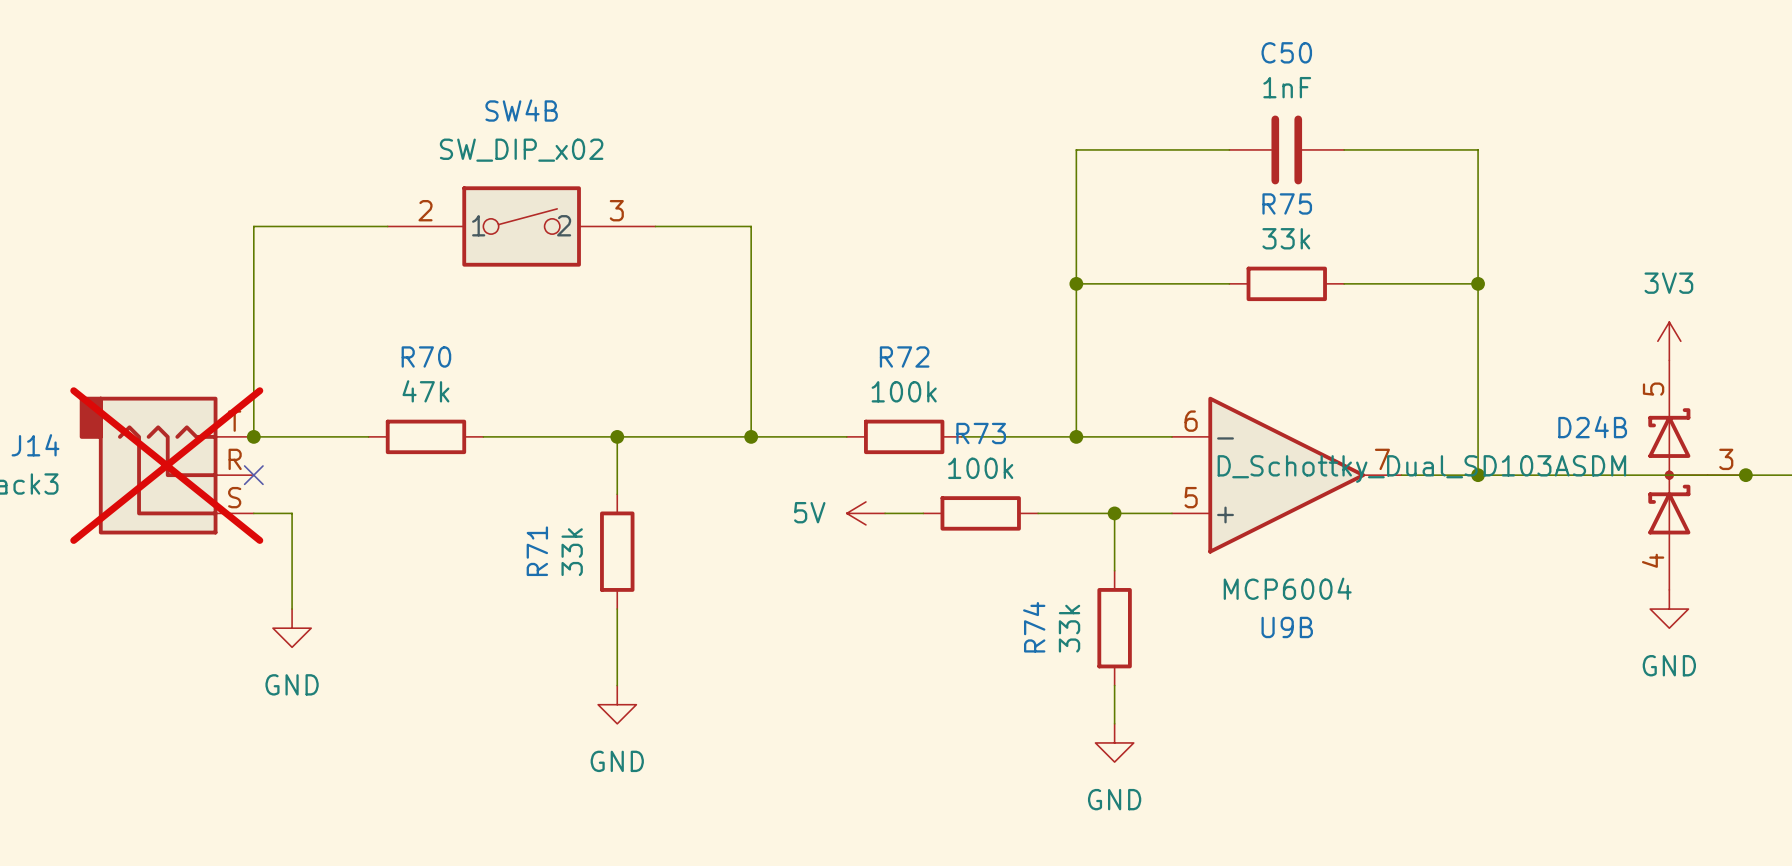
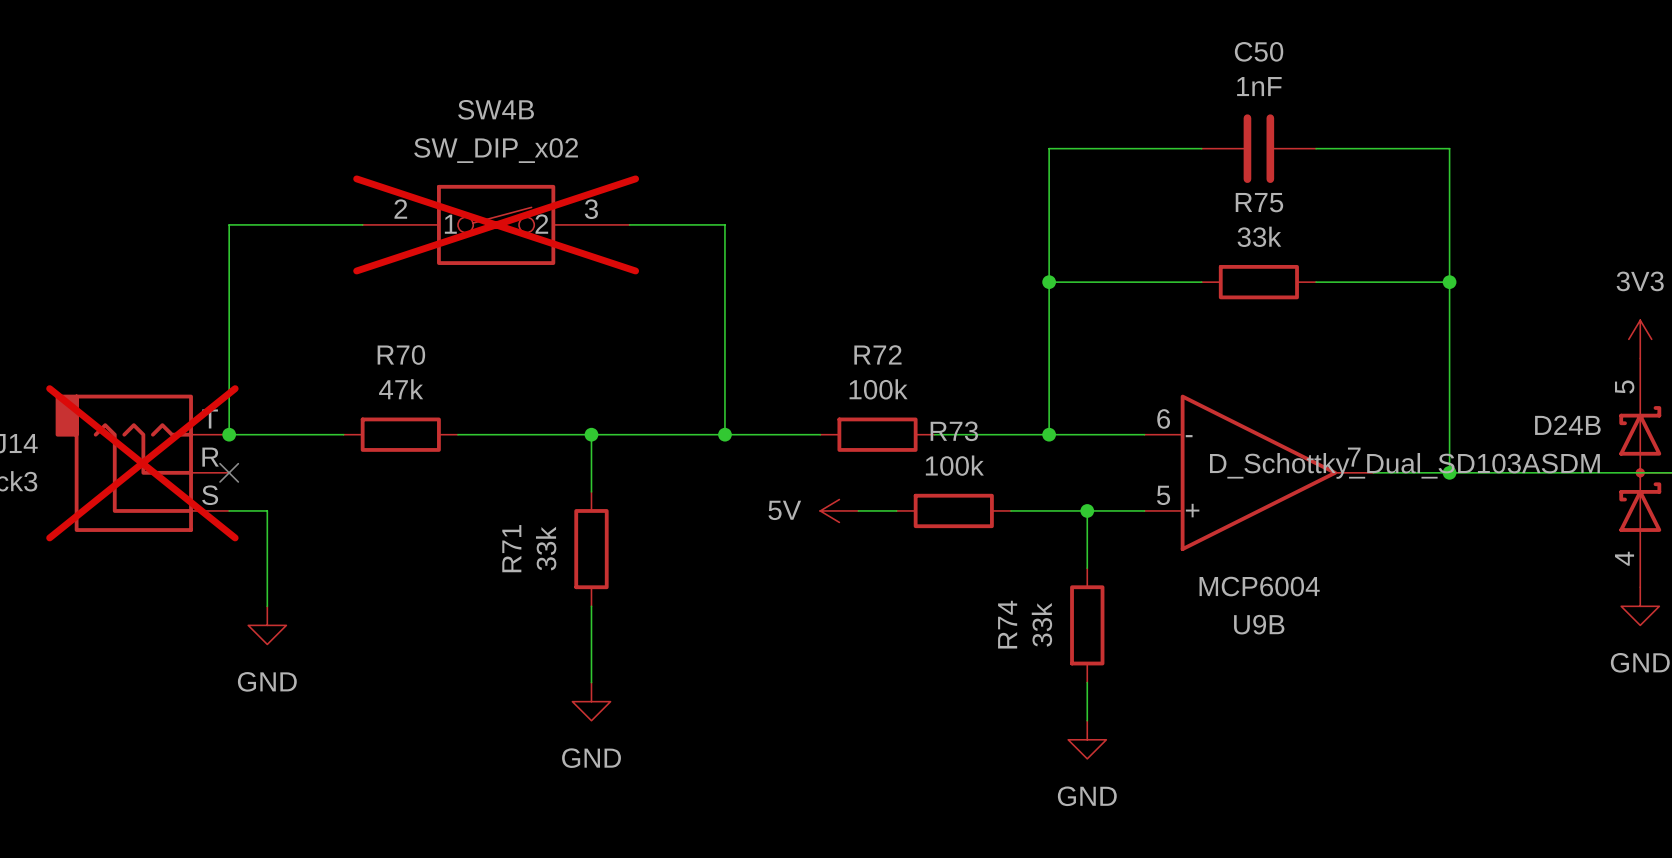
SW4B do-not-place cross: none -> (496, 224)

